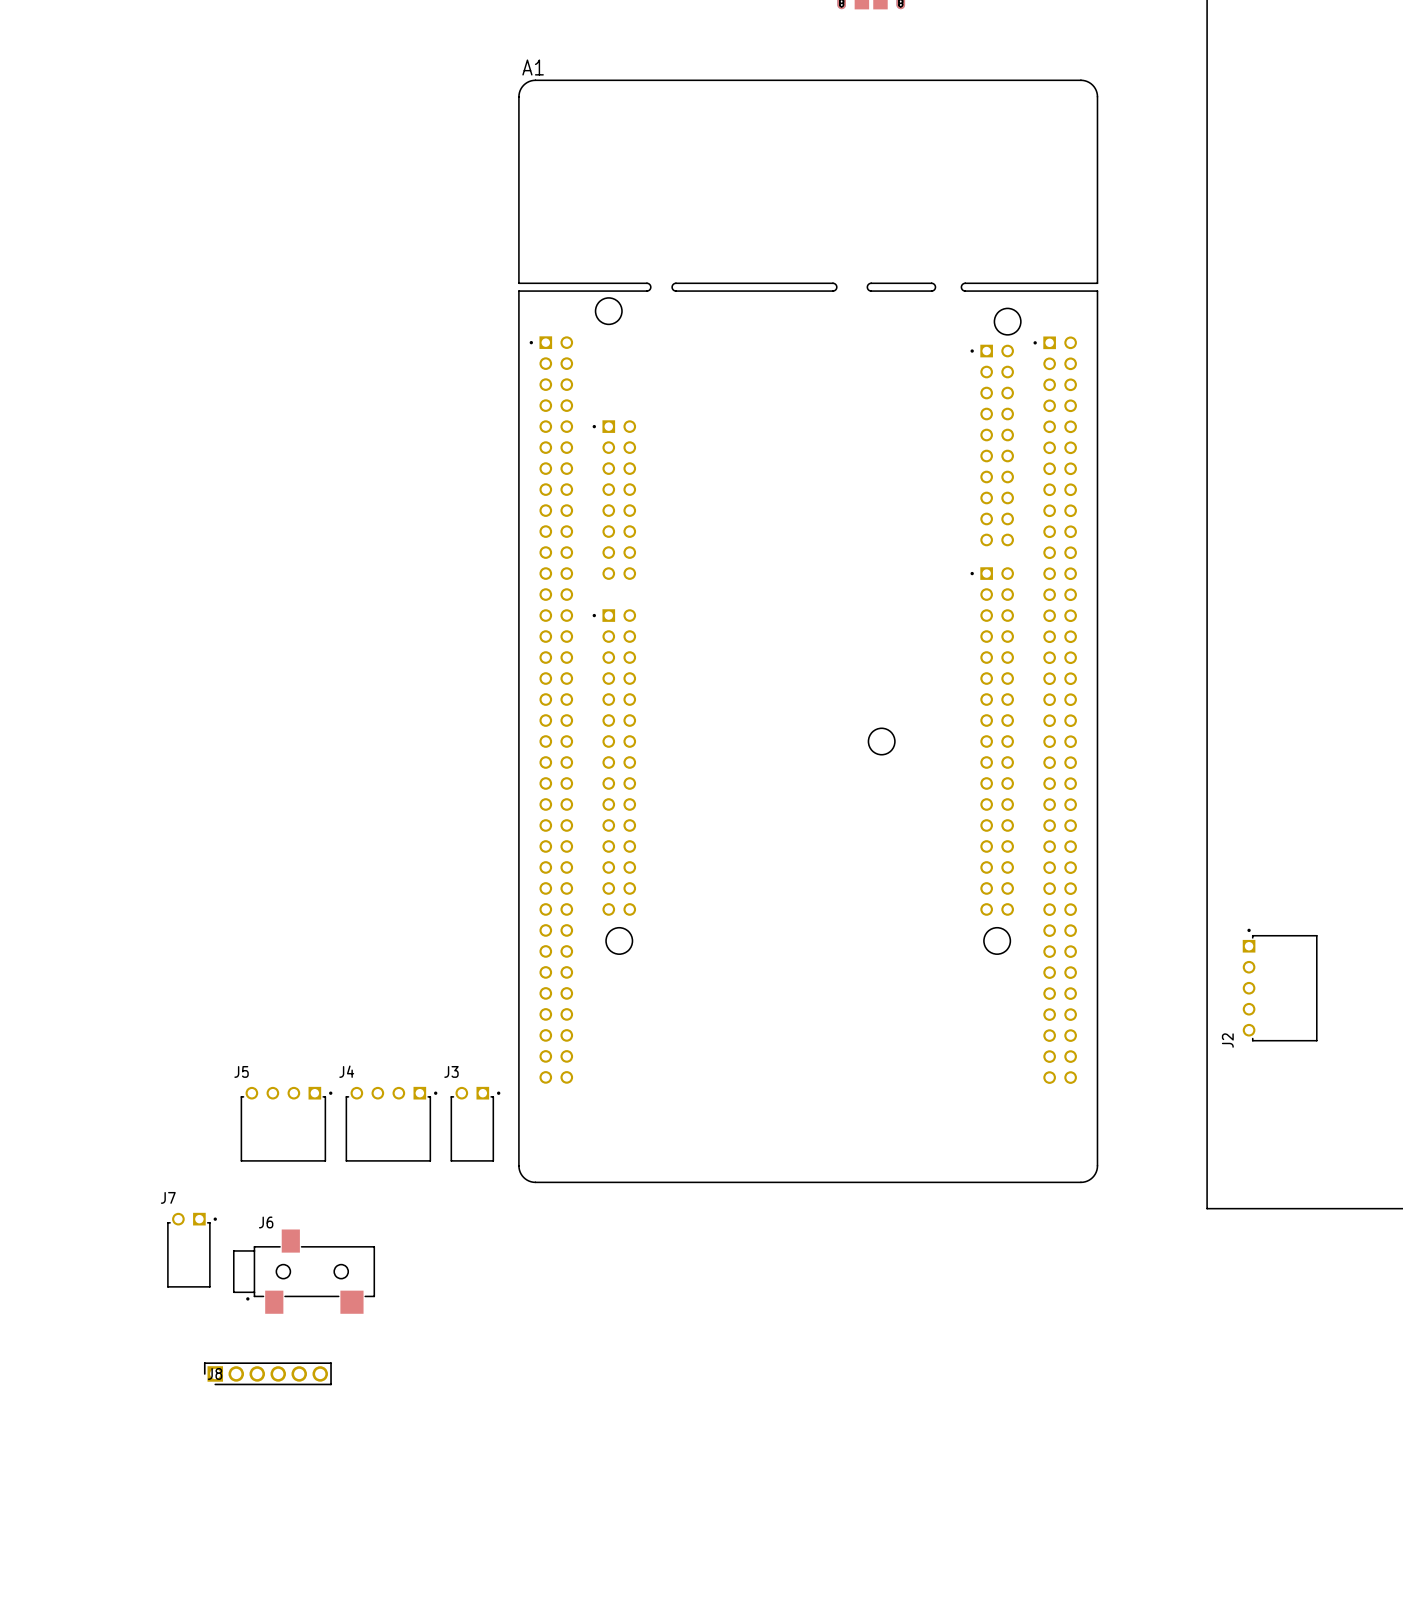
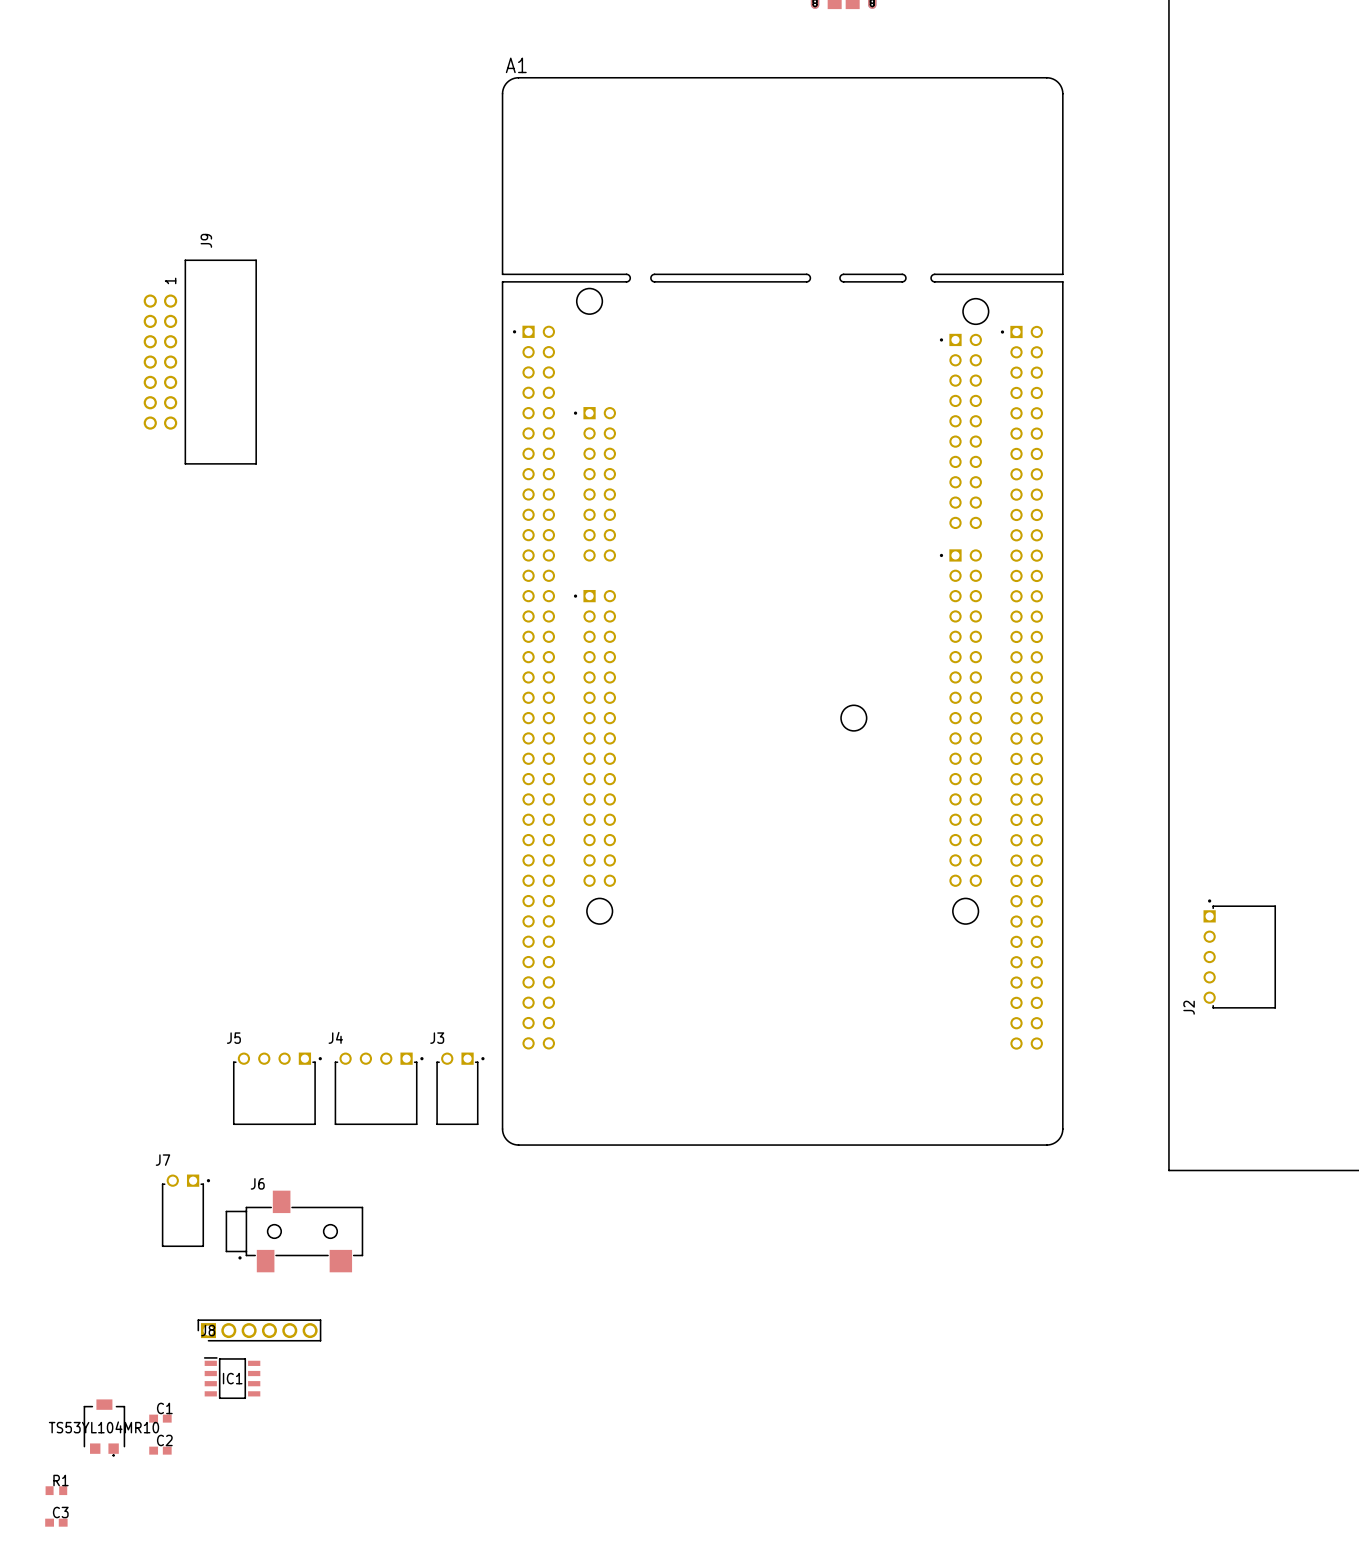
J9: none -> (200, 362)
IC1: none -> (232, 1378)
C1: none -> (160, 1418)
TS53YL104MR10: none -> (104, 1427)
C2: none -> (160, 1450)
R1: none -> (56, 1490)
C3: none -> (56, 1522)

